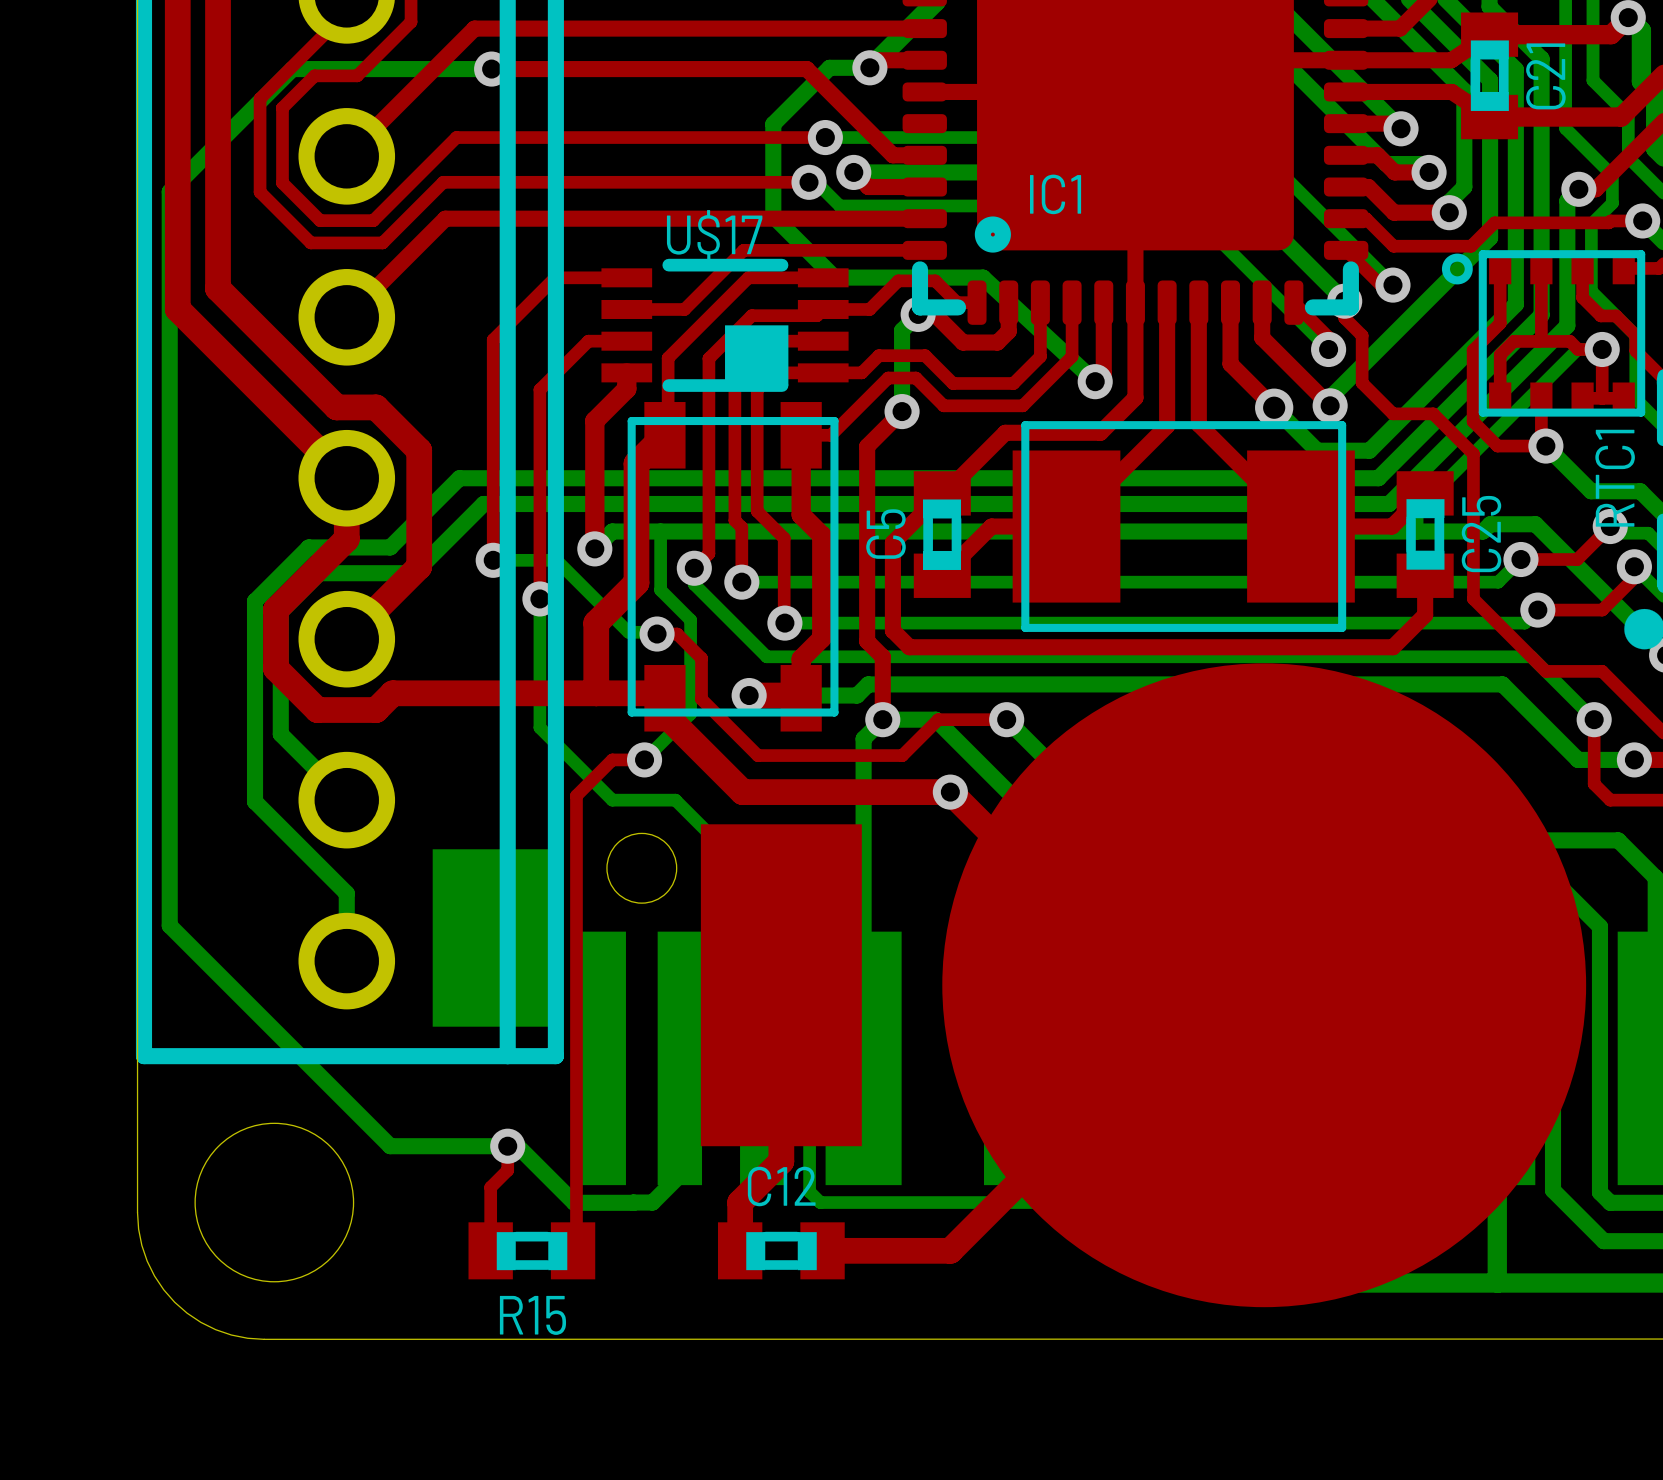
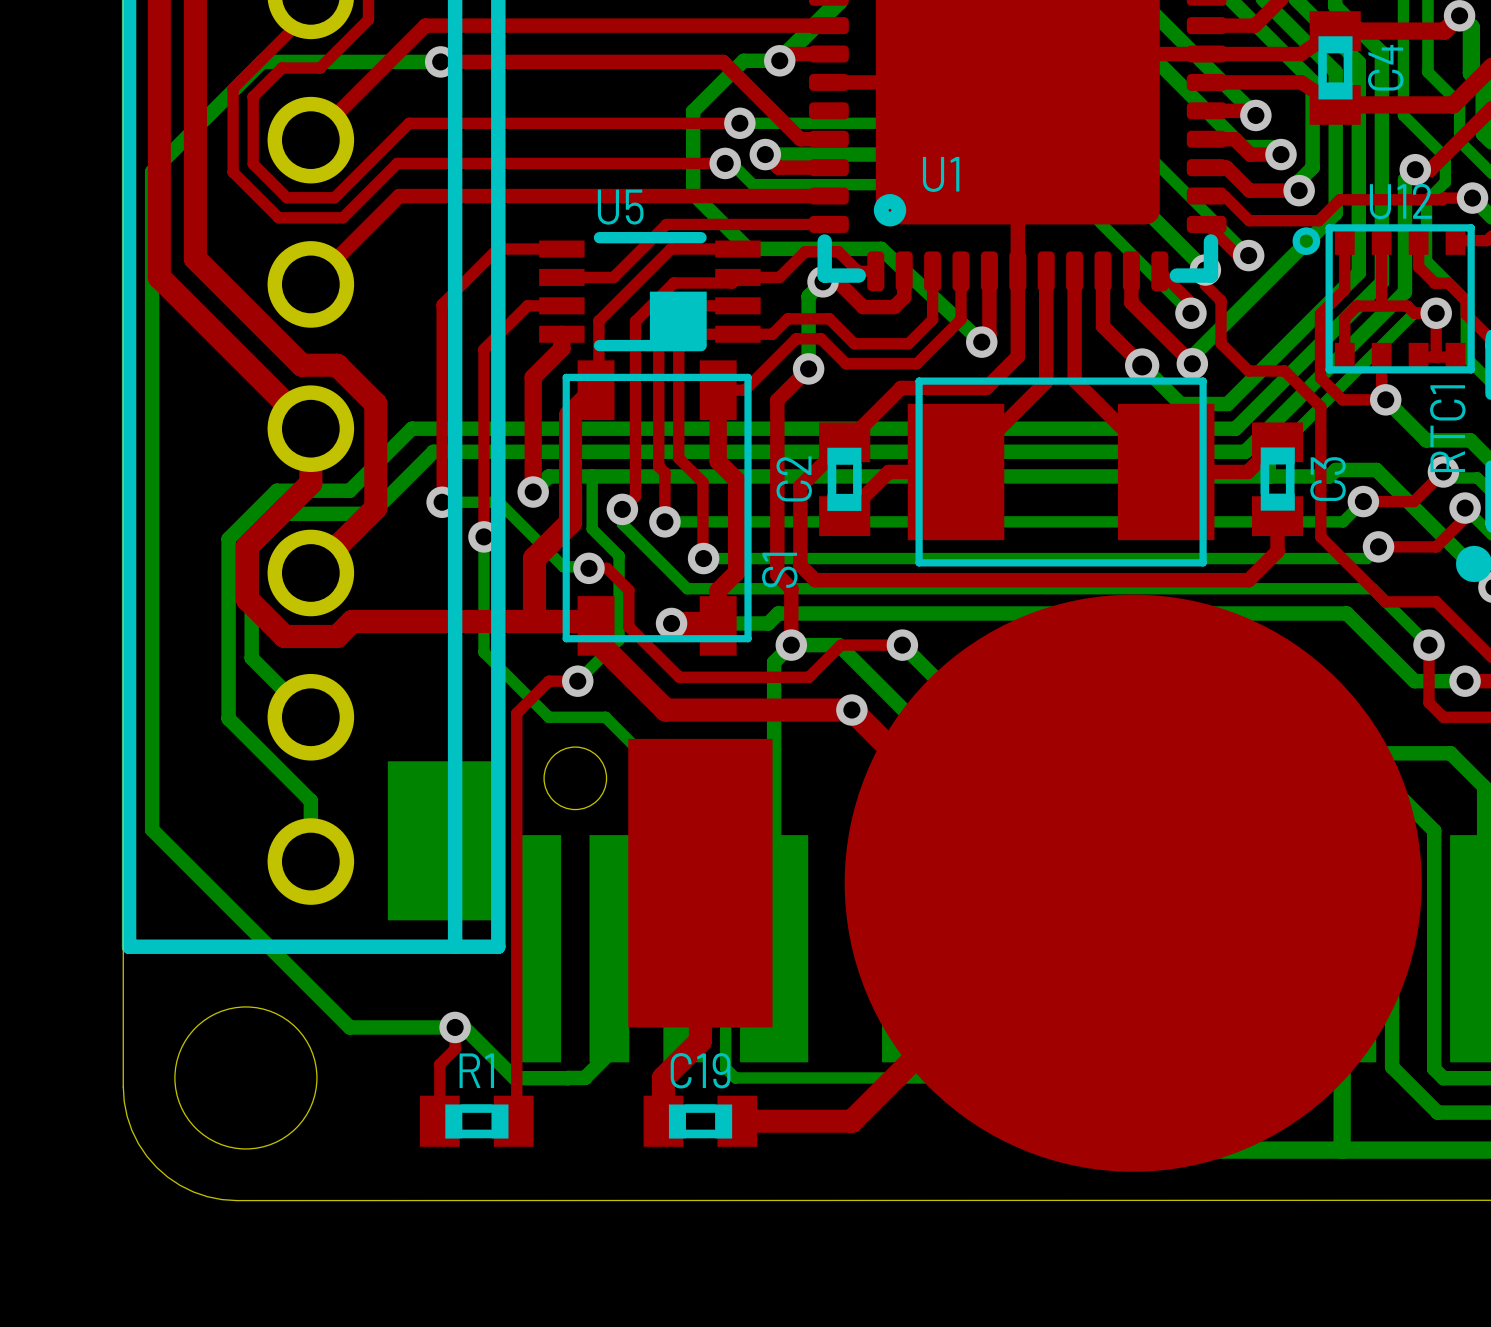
C21 name: C21 (1545, 76) -> C4 (1385, 67)
IC1 name: IC1 (1055, 194) -> U1 (941, 174)
U12 name: none -> U12 (1400, 201)
U$17 name: U$17 (714, 234) -> U5 (620, 207)
C5 name: C5 (886, 534) -> C2 (794, 478)
C25 name: C25 (1481, 534) -> C3 (1328, 479)
S1 name: none -> S1 (779, 570)
C12 name: C12 (781, 1186) -> C19 (700, 1070)
R15 name: R15 (532, 1315) -> R1 (476, 1070)

